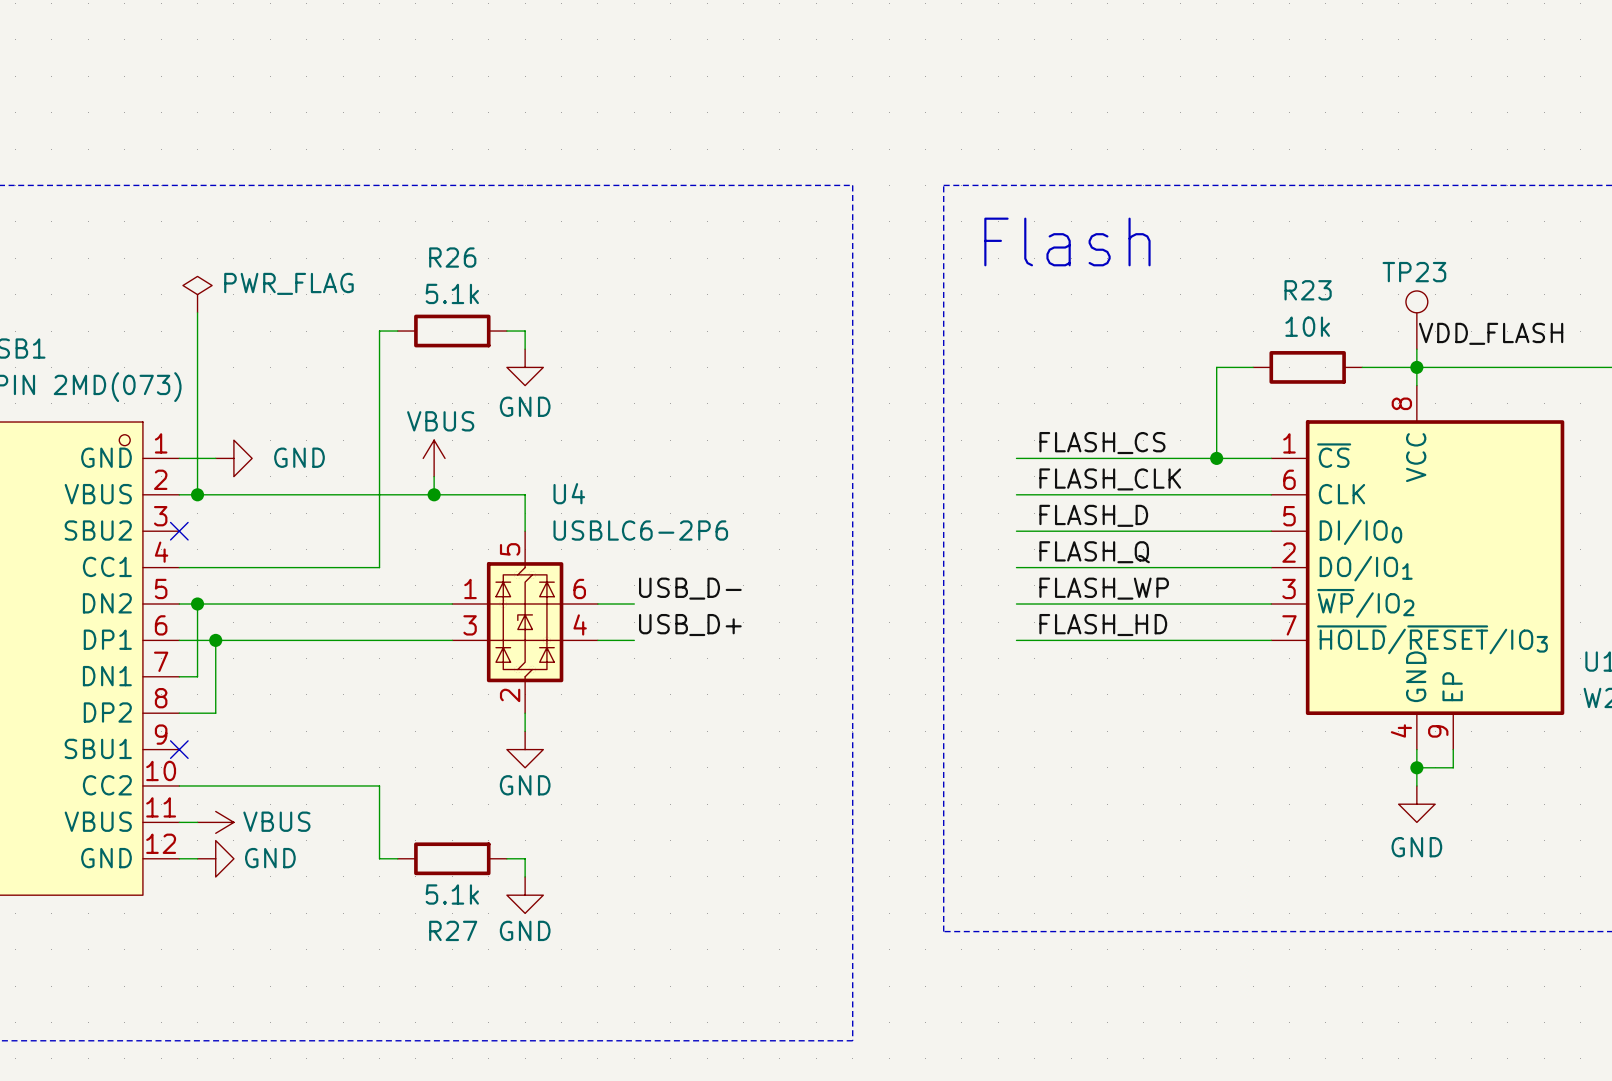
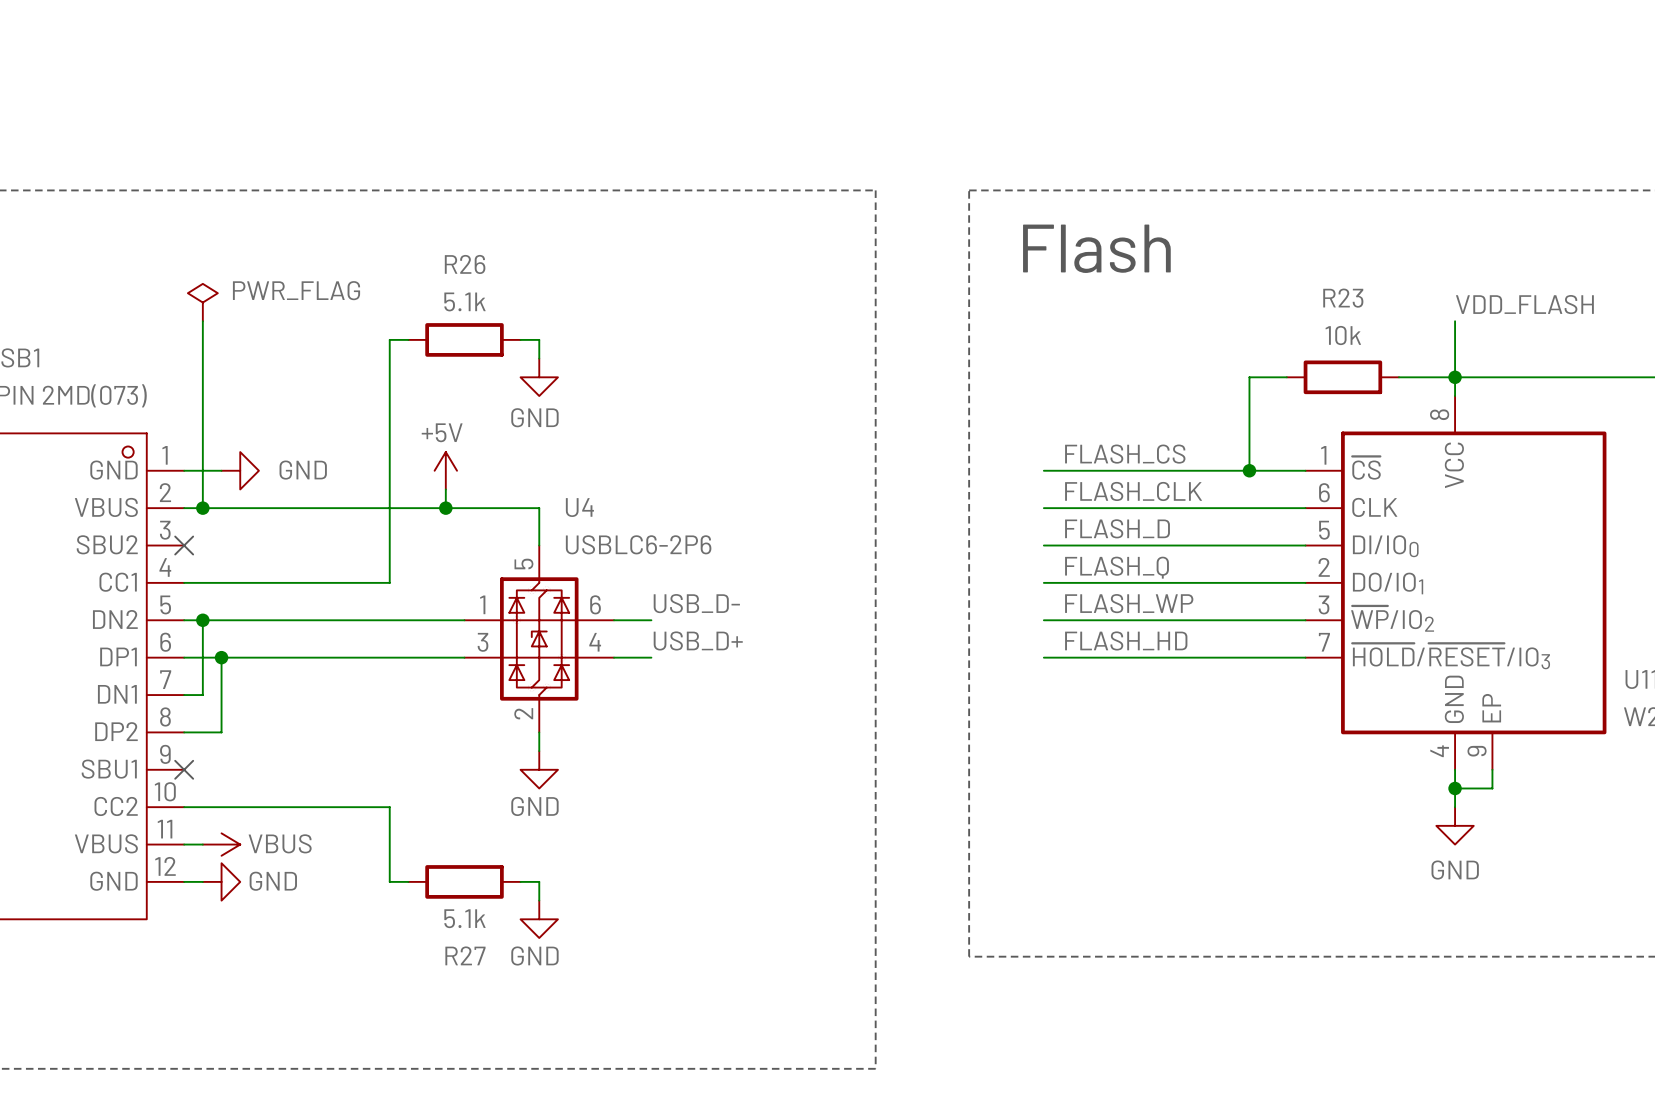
TP23: (1416, 320) -> none
label position: VDD_FLASH (1491, 333) -> VDD_FLASH (1524, 304)
power symbol: VBUS (434, 458) -> +5V (445, 470)

